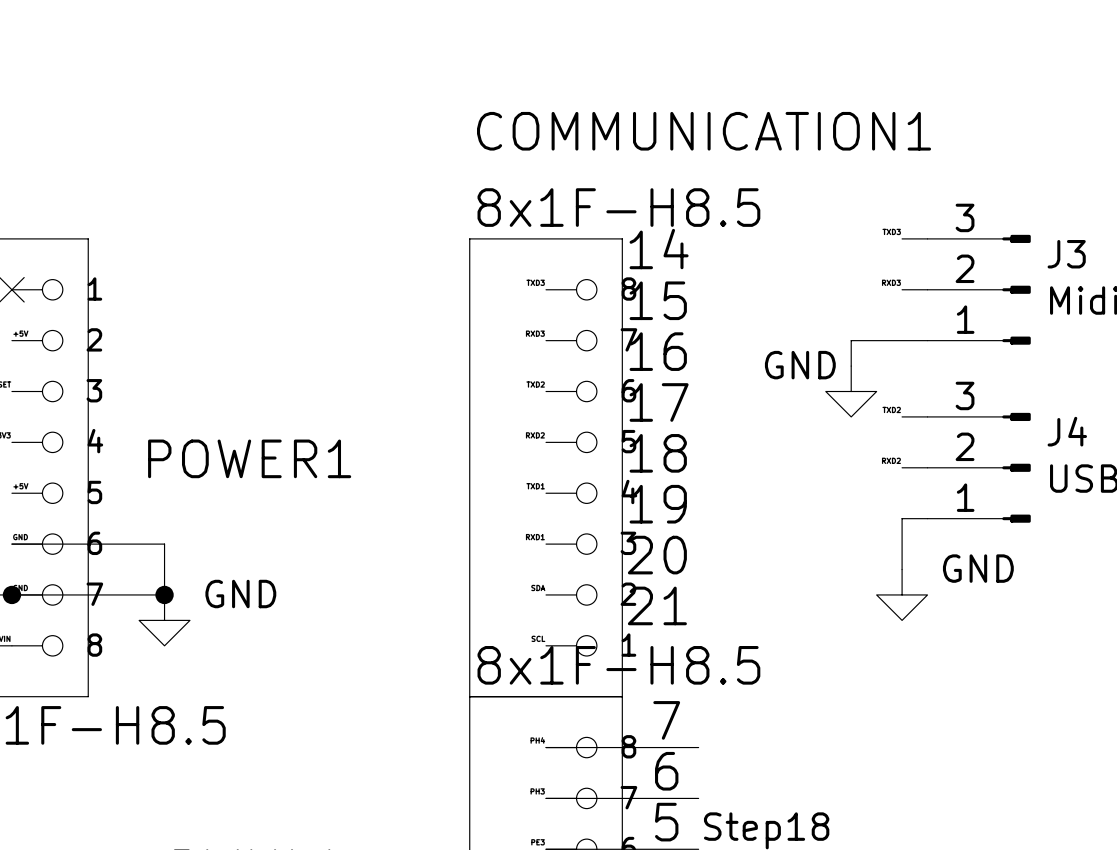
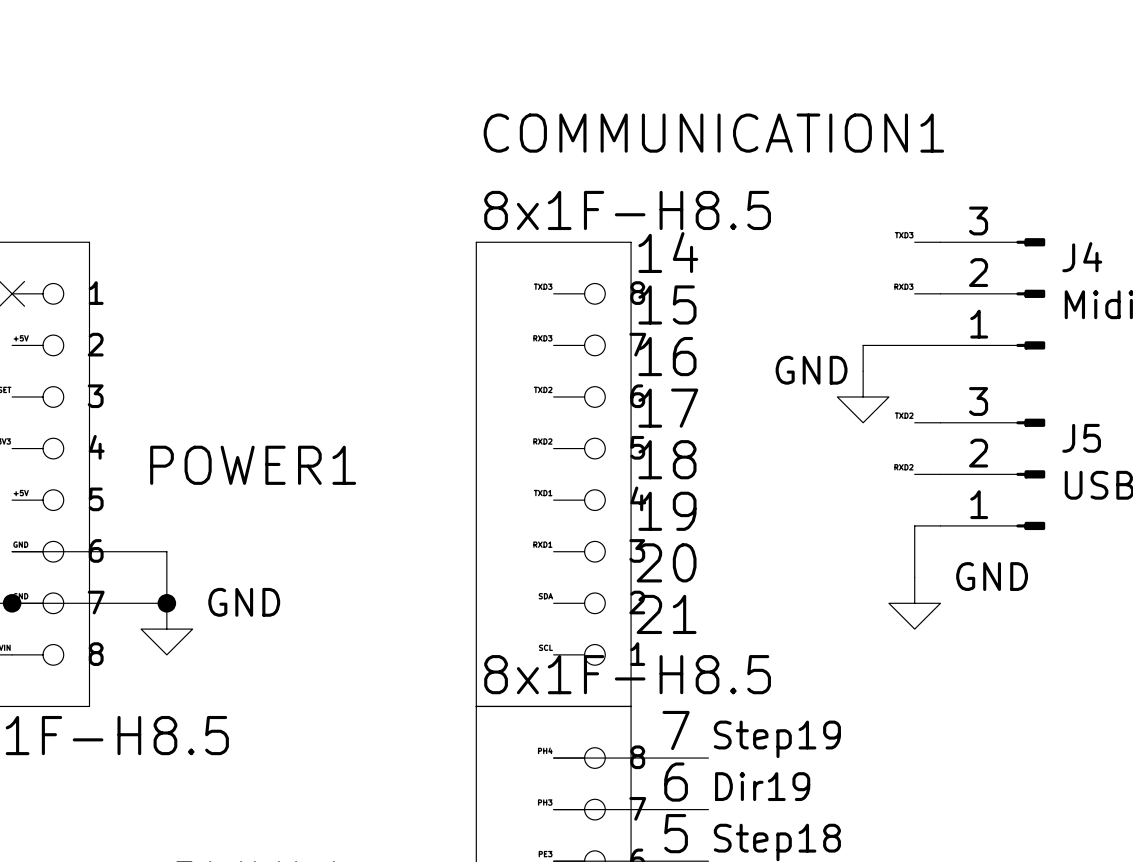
J3 name: J3 (1066, 254) -> J4 (1082, 257)
J4 name: J4 (1067, 431) -> J5 (1081, 438)
label: none -> Step19 (777, 739)
label: none -> Dir19 (762, 786)

